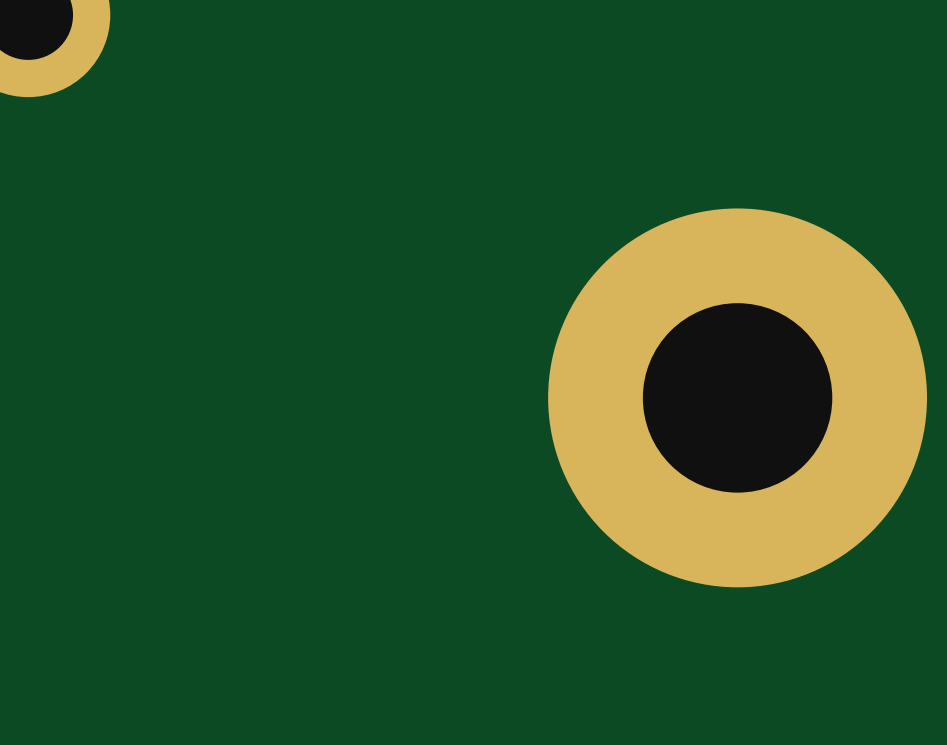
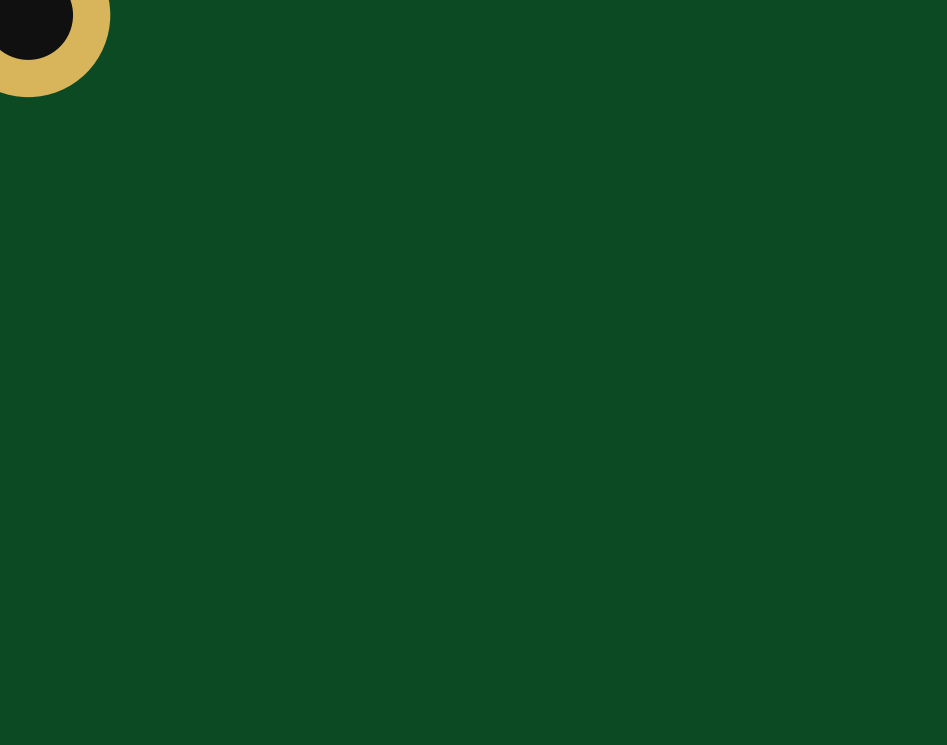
part: (737, 397) -> none

